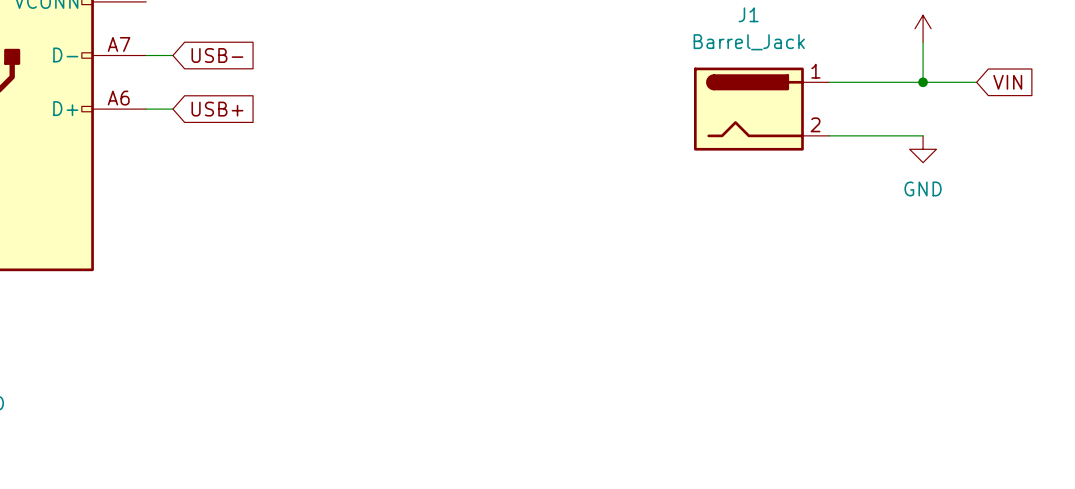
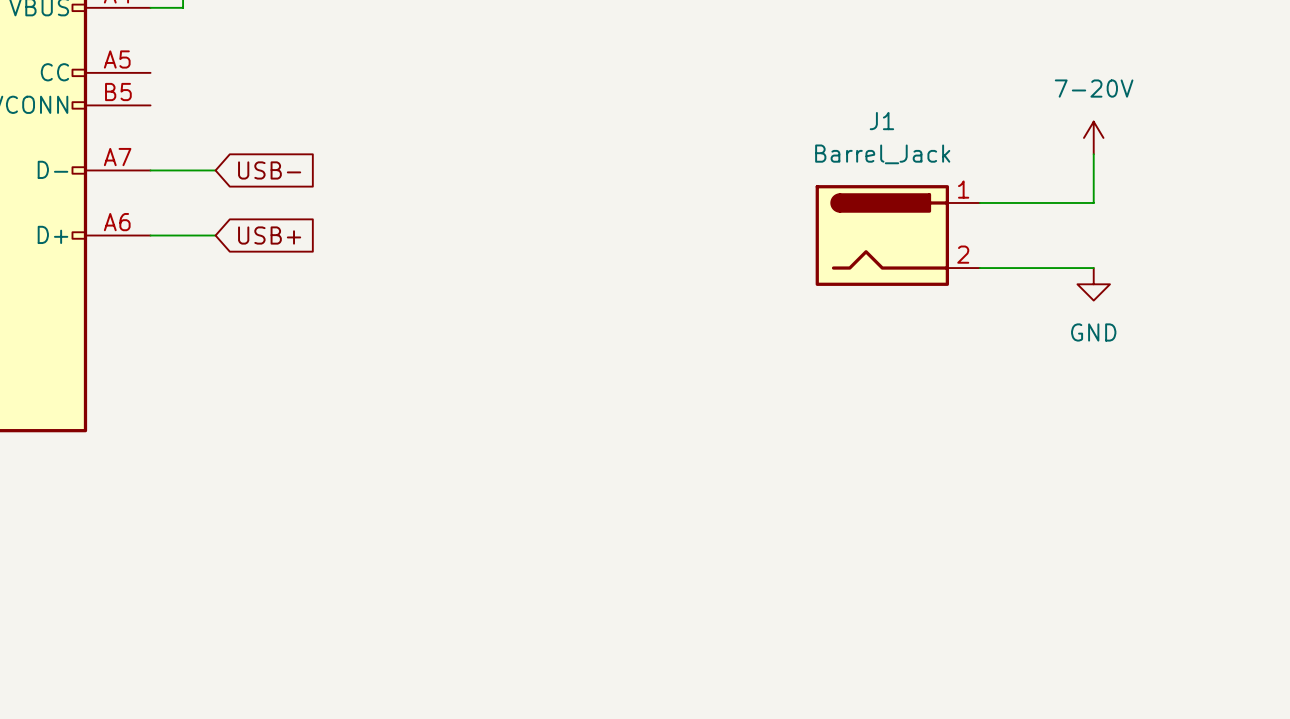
wire: none -> (183, 170) (215, 170)
global label position: USB- (217, 55) -> USB- (269, 170)
wire: (923, 82) (976, 82) -> none
junction: (923, 82) -> none
global label: VIN (1007, 82) -> none
wire: none -> (183, 235) (215, 235)
global label position: USB+ (217, 109) -> USB+ (269, 235)

